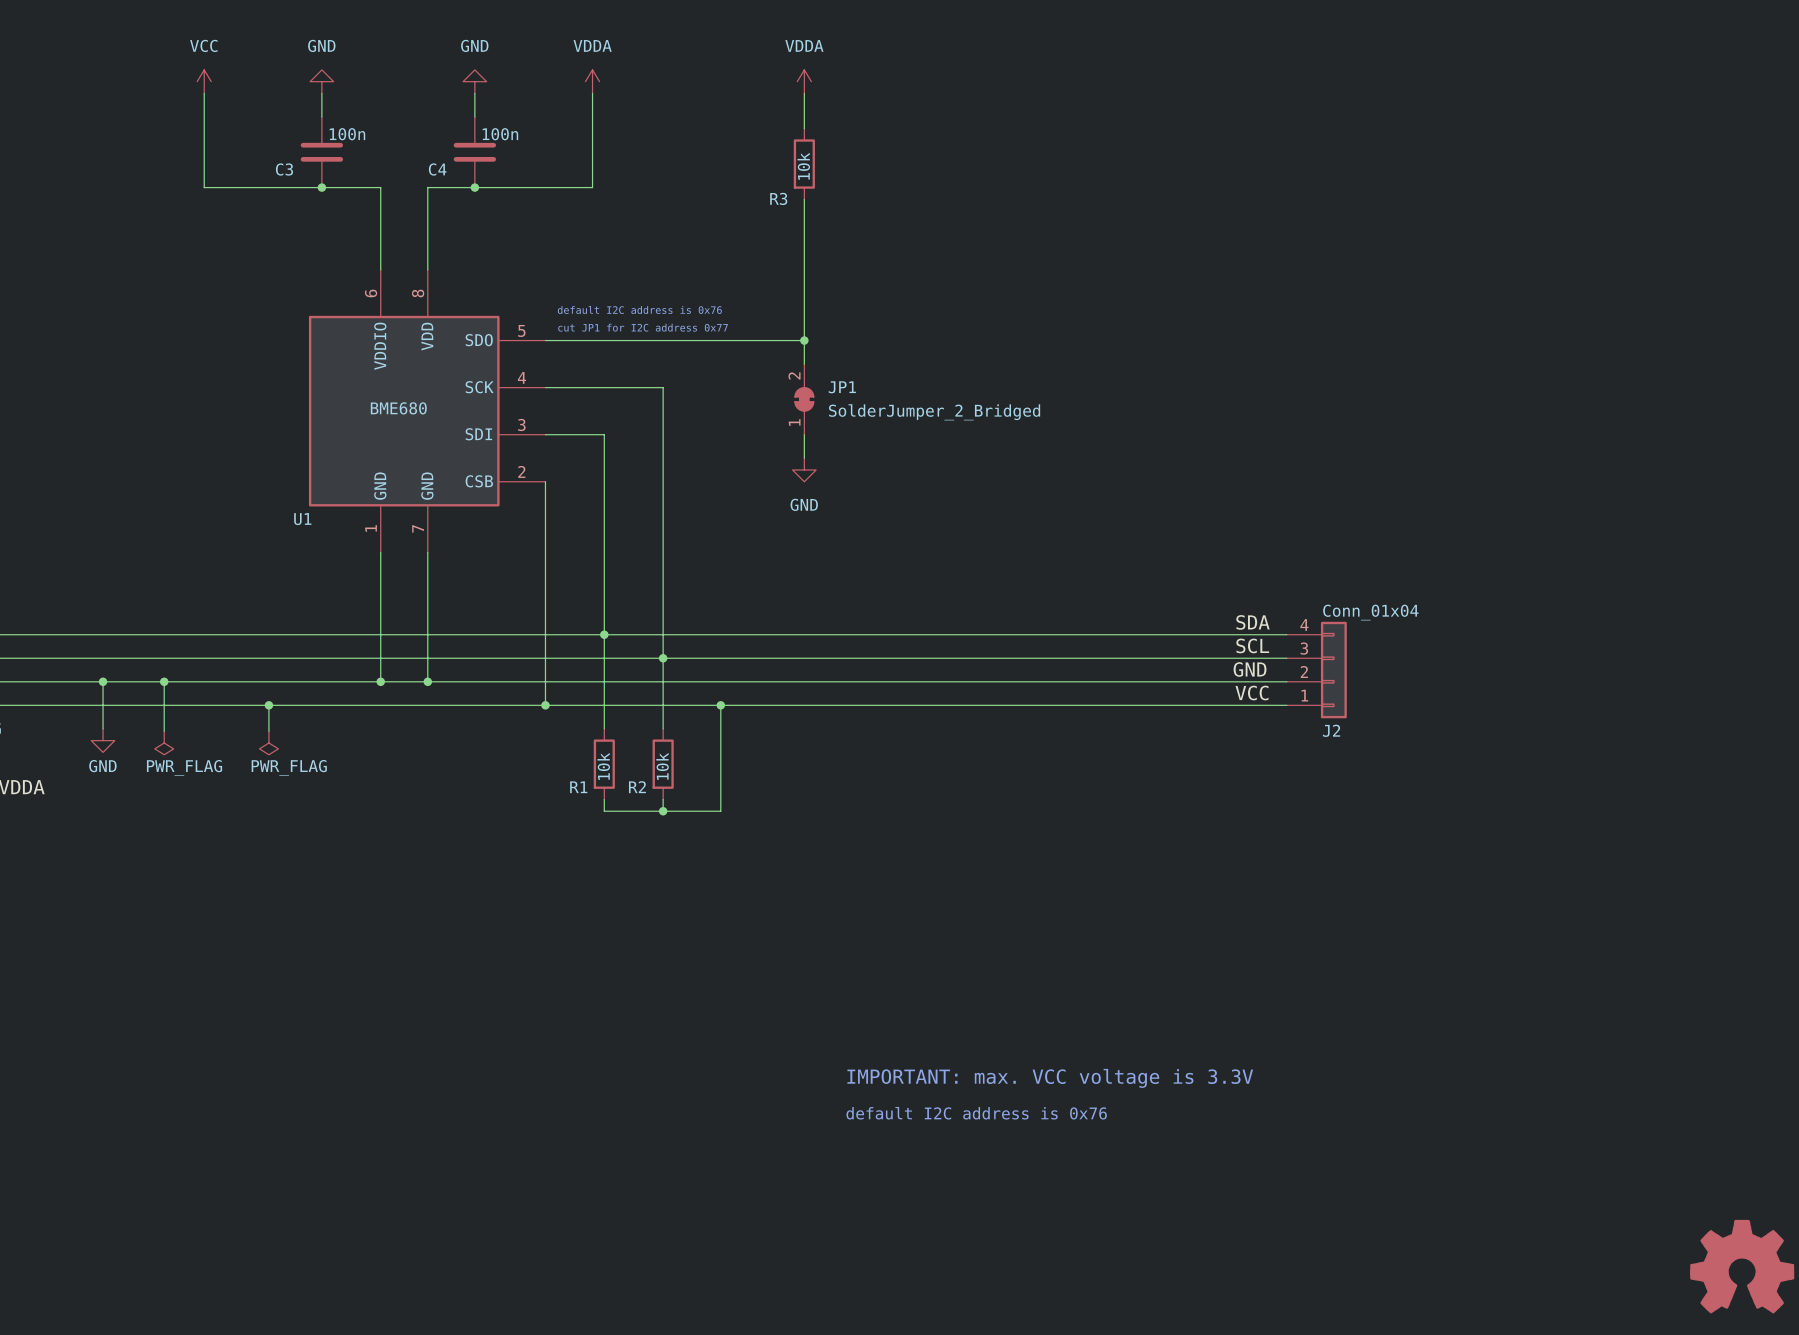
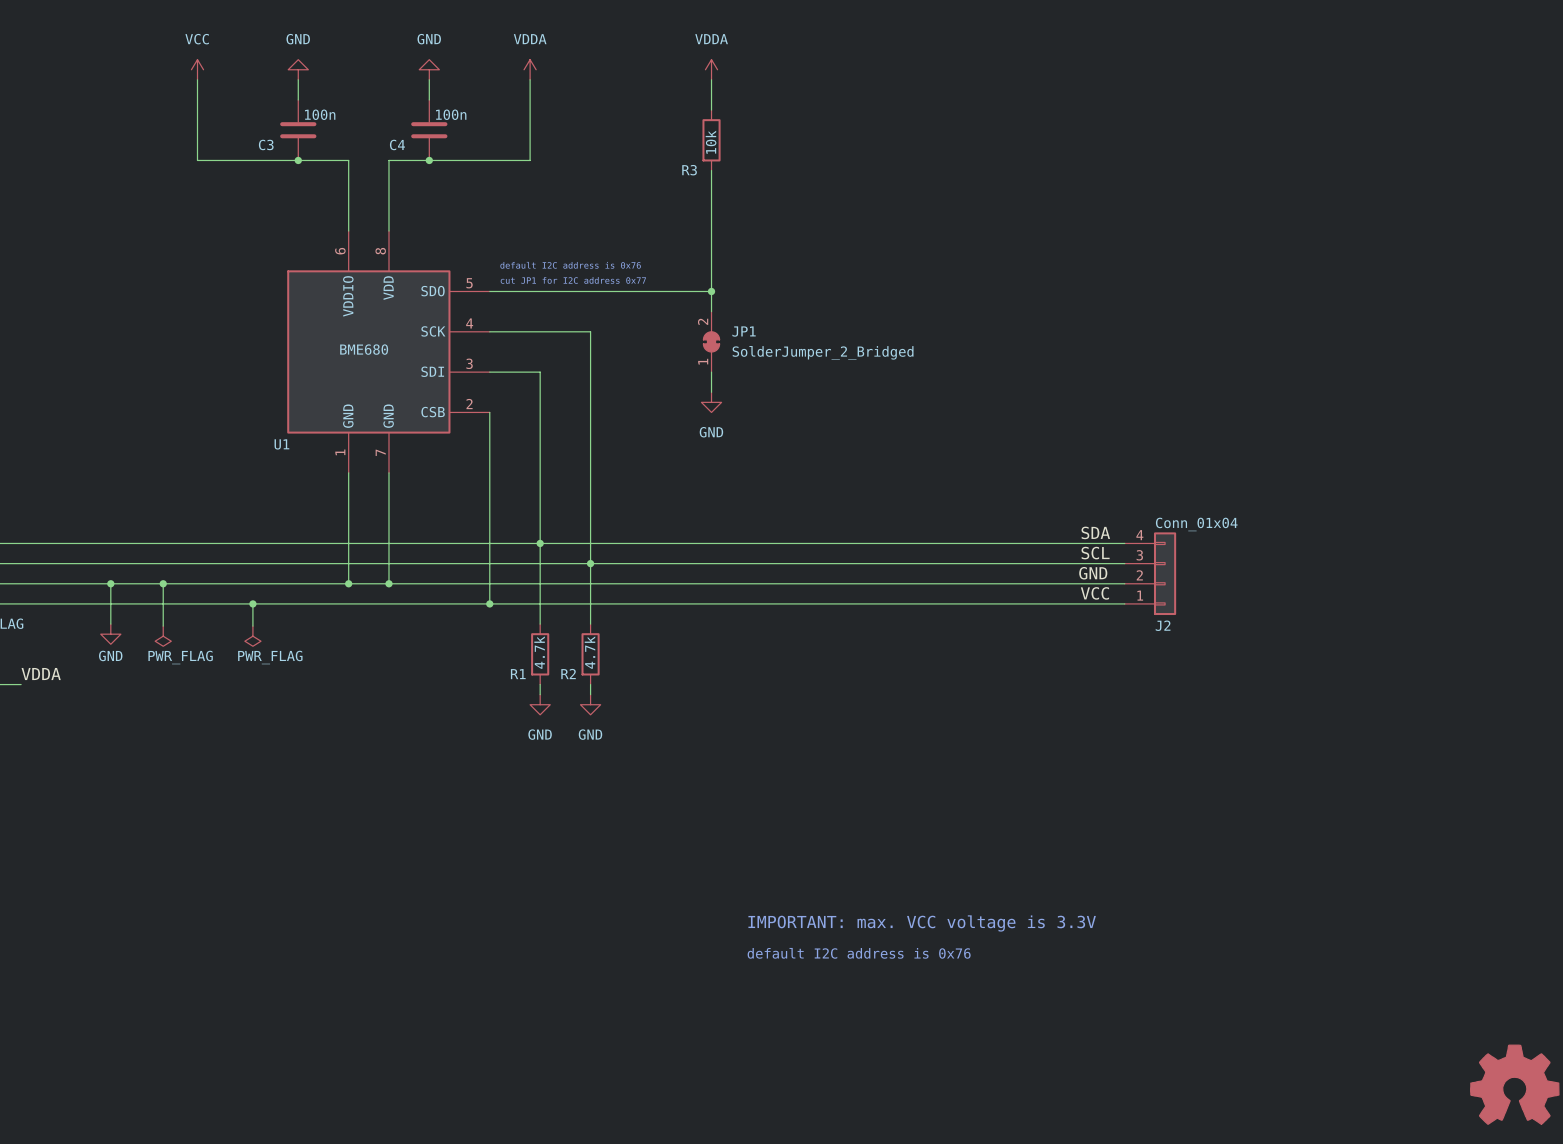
wire: (720, 705) (720, 811) (604, 811) -> none
junction: (720, 705) -> none
R1 value: 10k (603, 766) -> 4.7k (539, 652)
R2 value: 10k (662, 766) -> 4.7k (589, 652)
junction: (663, 811) -> none
power symbol: none -> GND (540, 704)
power symbol: none -> GND (590, 704)

